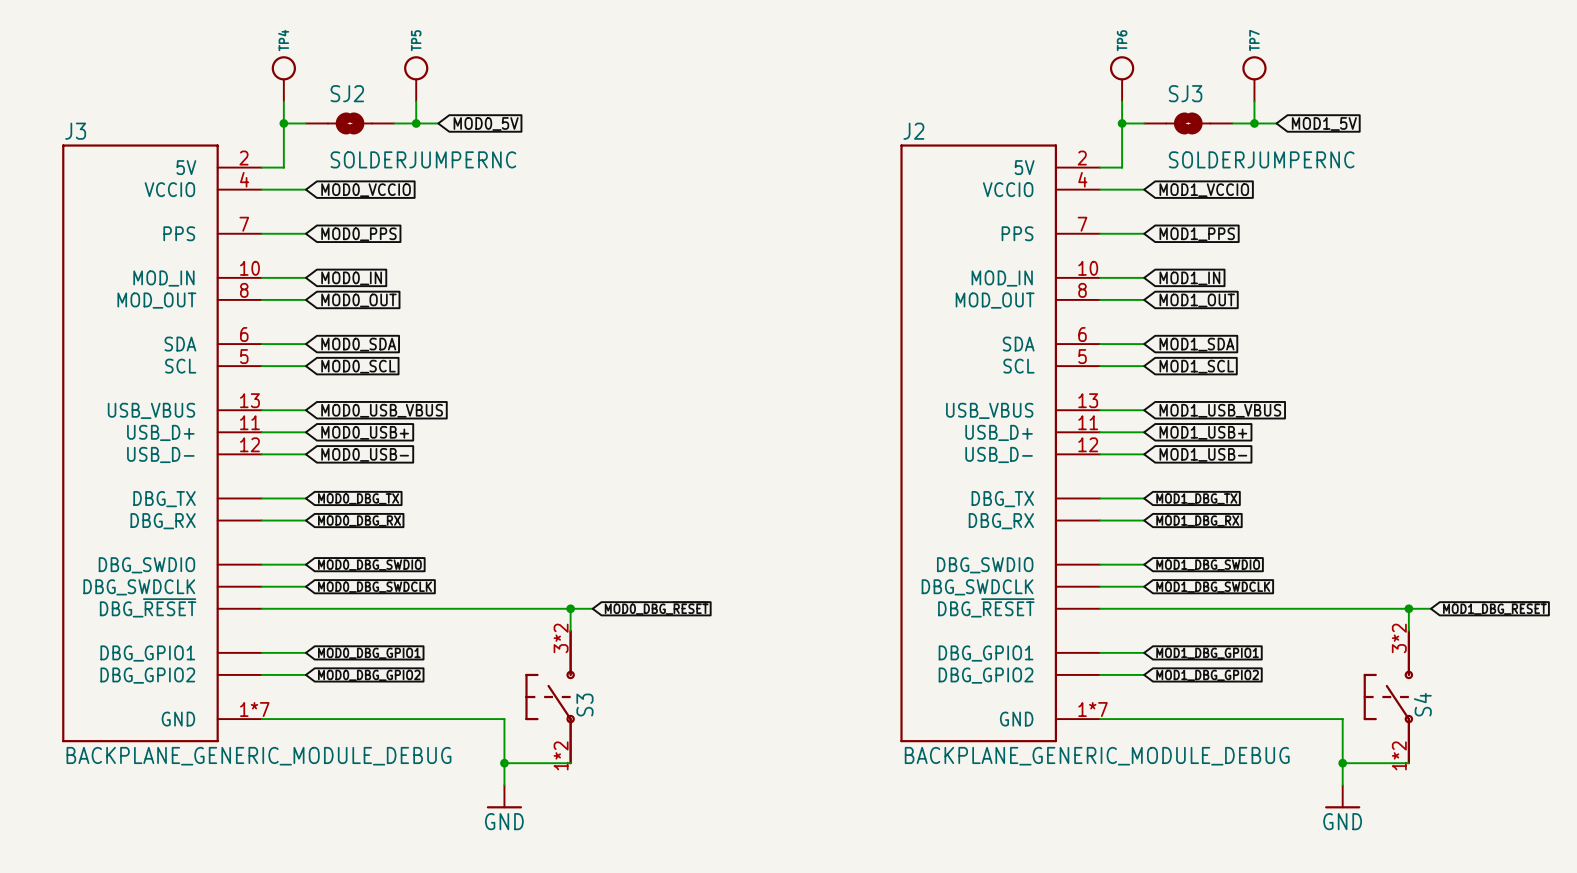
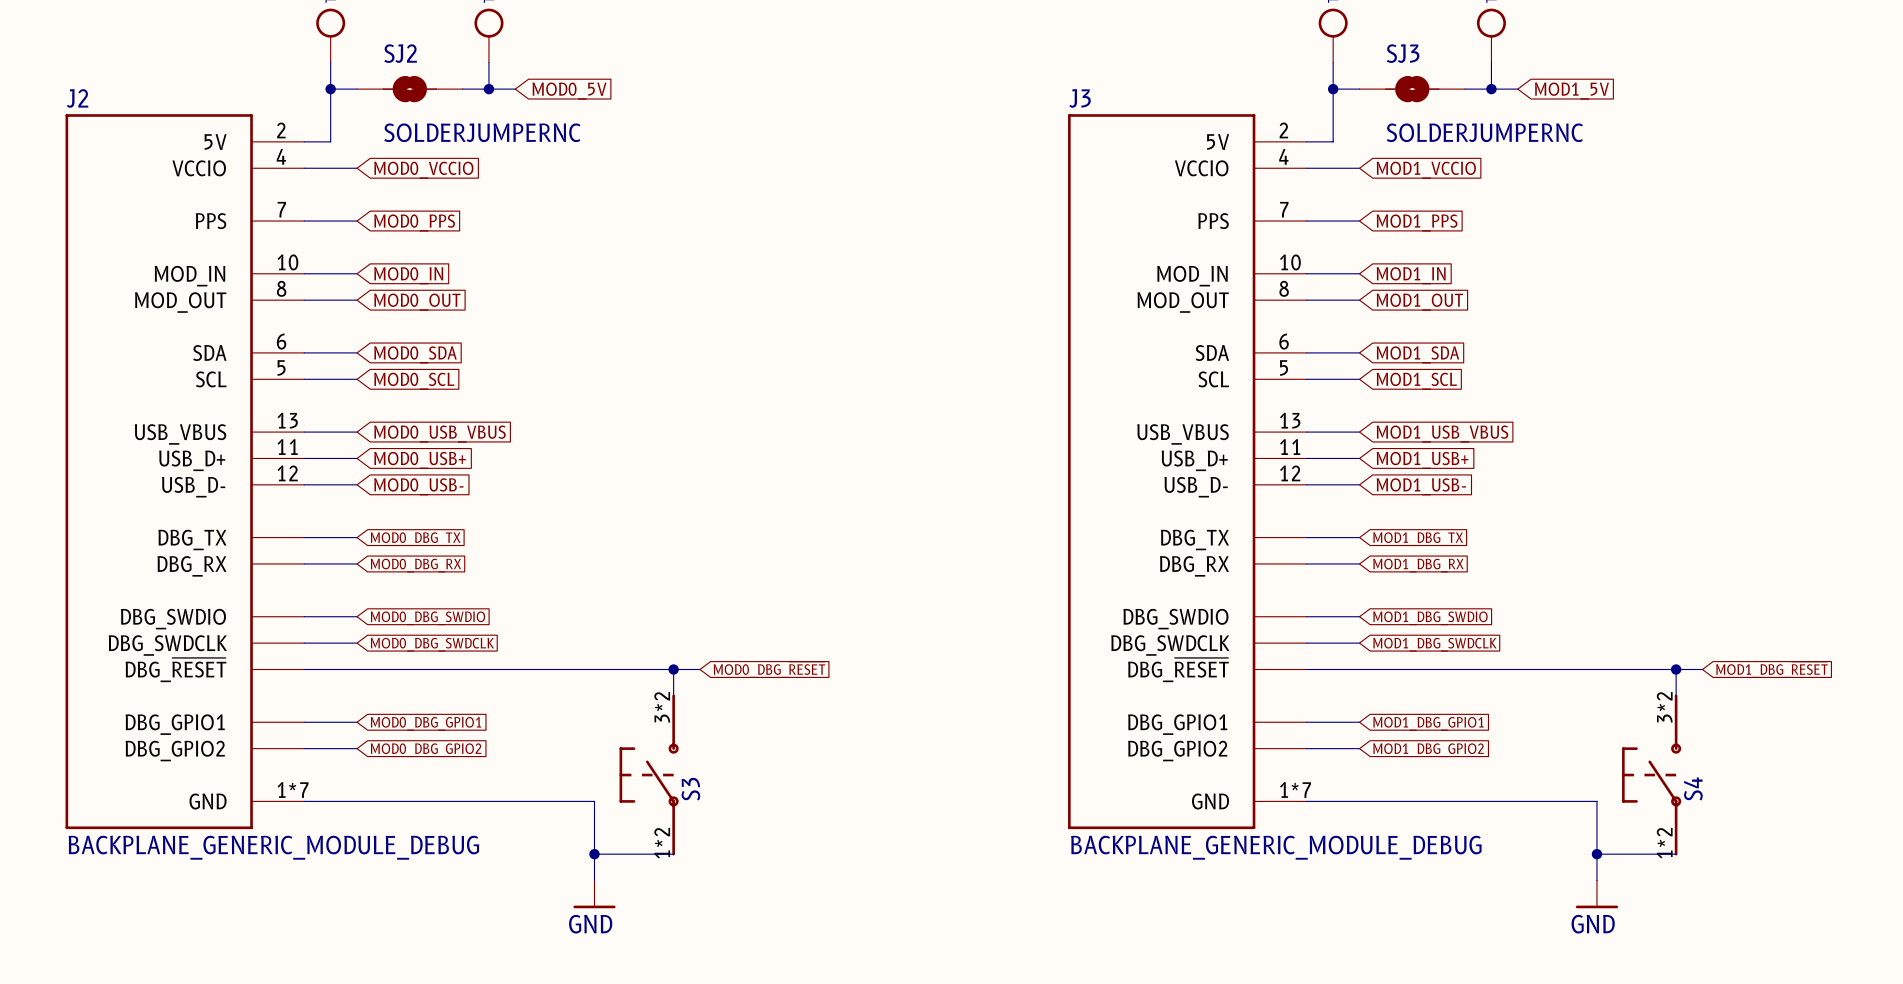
J3 name: J3 (75, 131) -> J2 (77, 98)
J2 name: J2 (913, 131) -> J3 (1080, 98)

